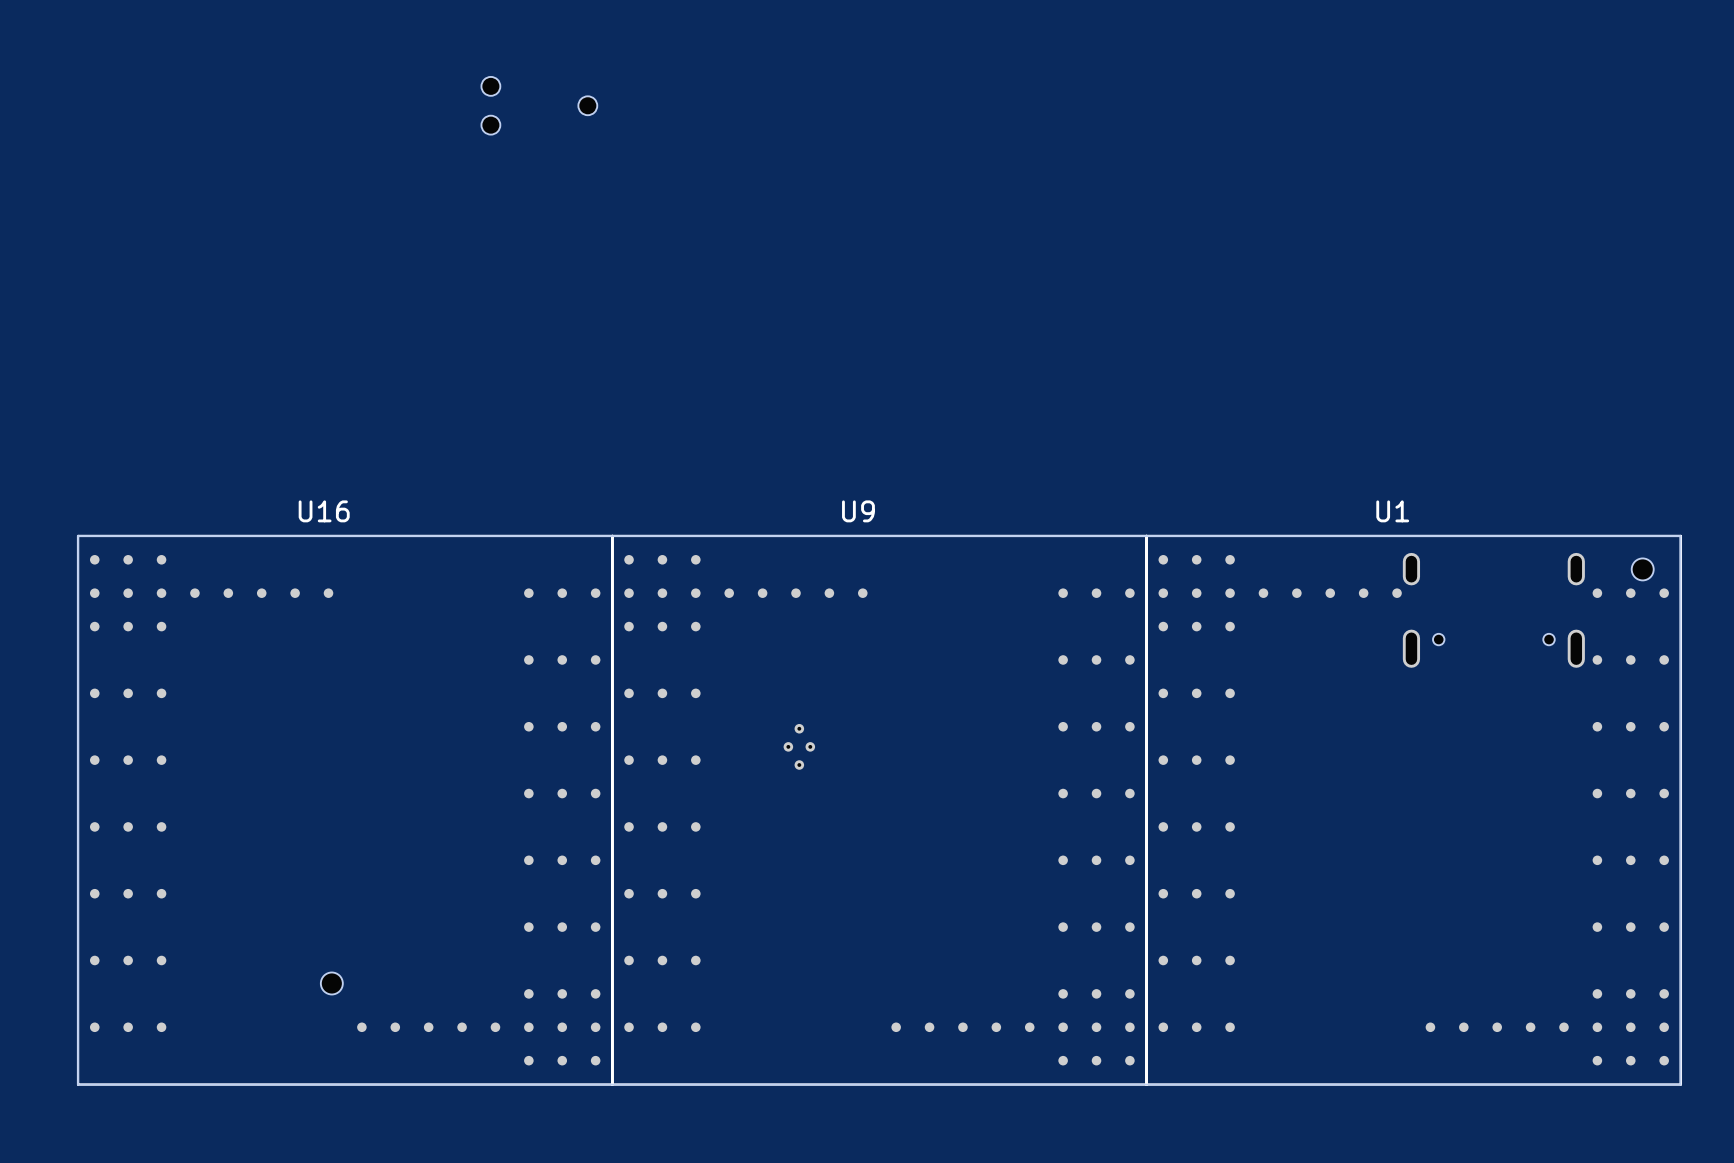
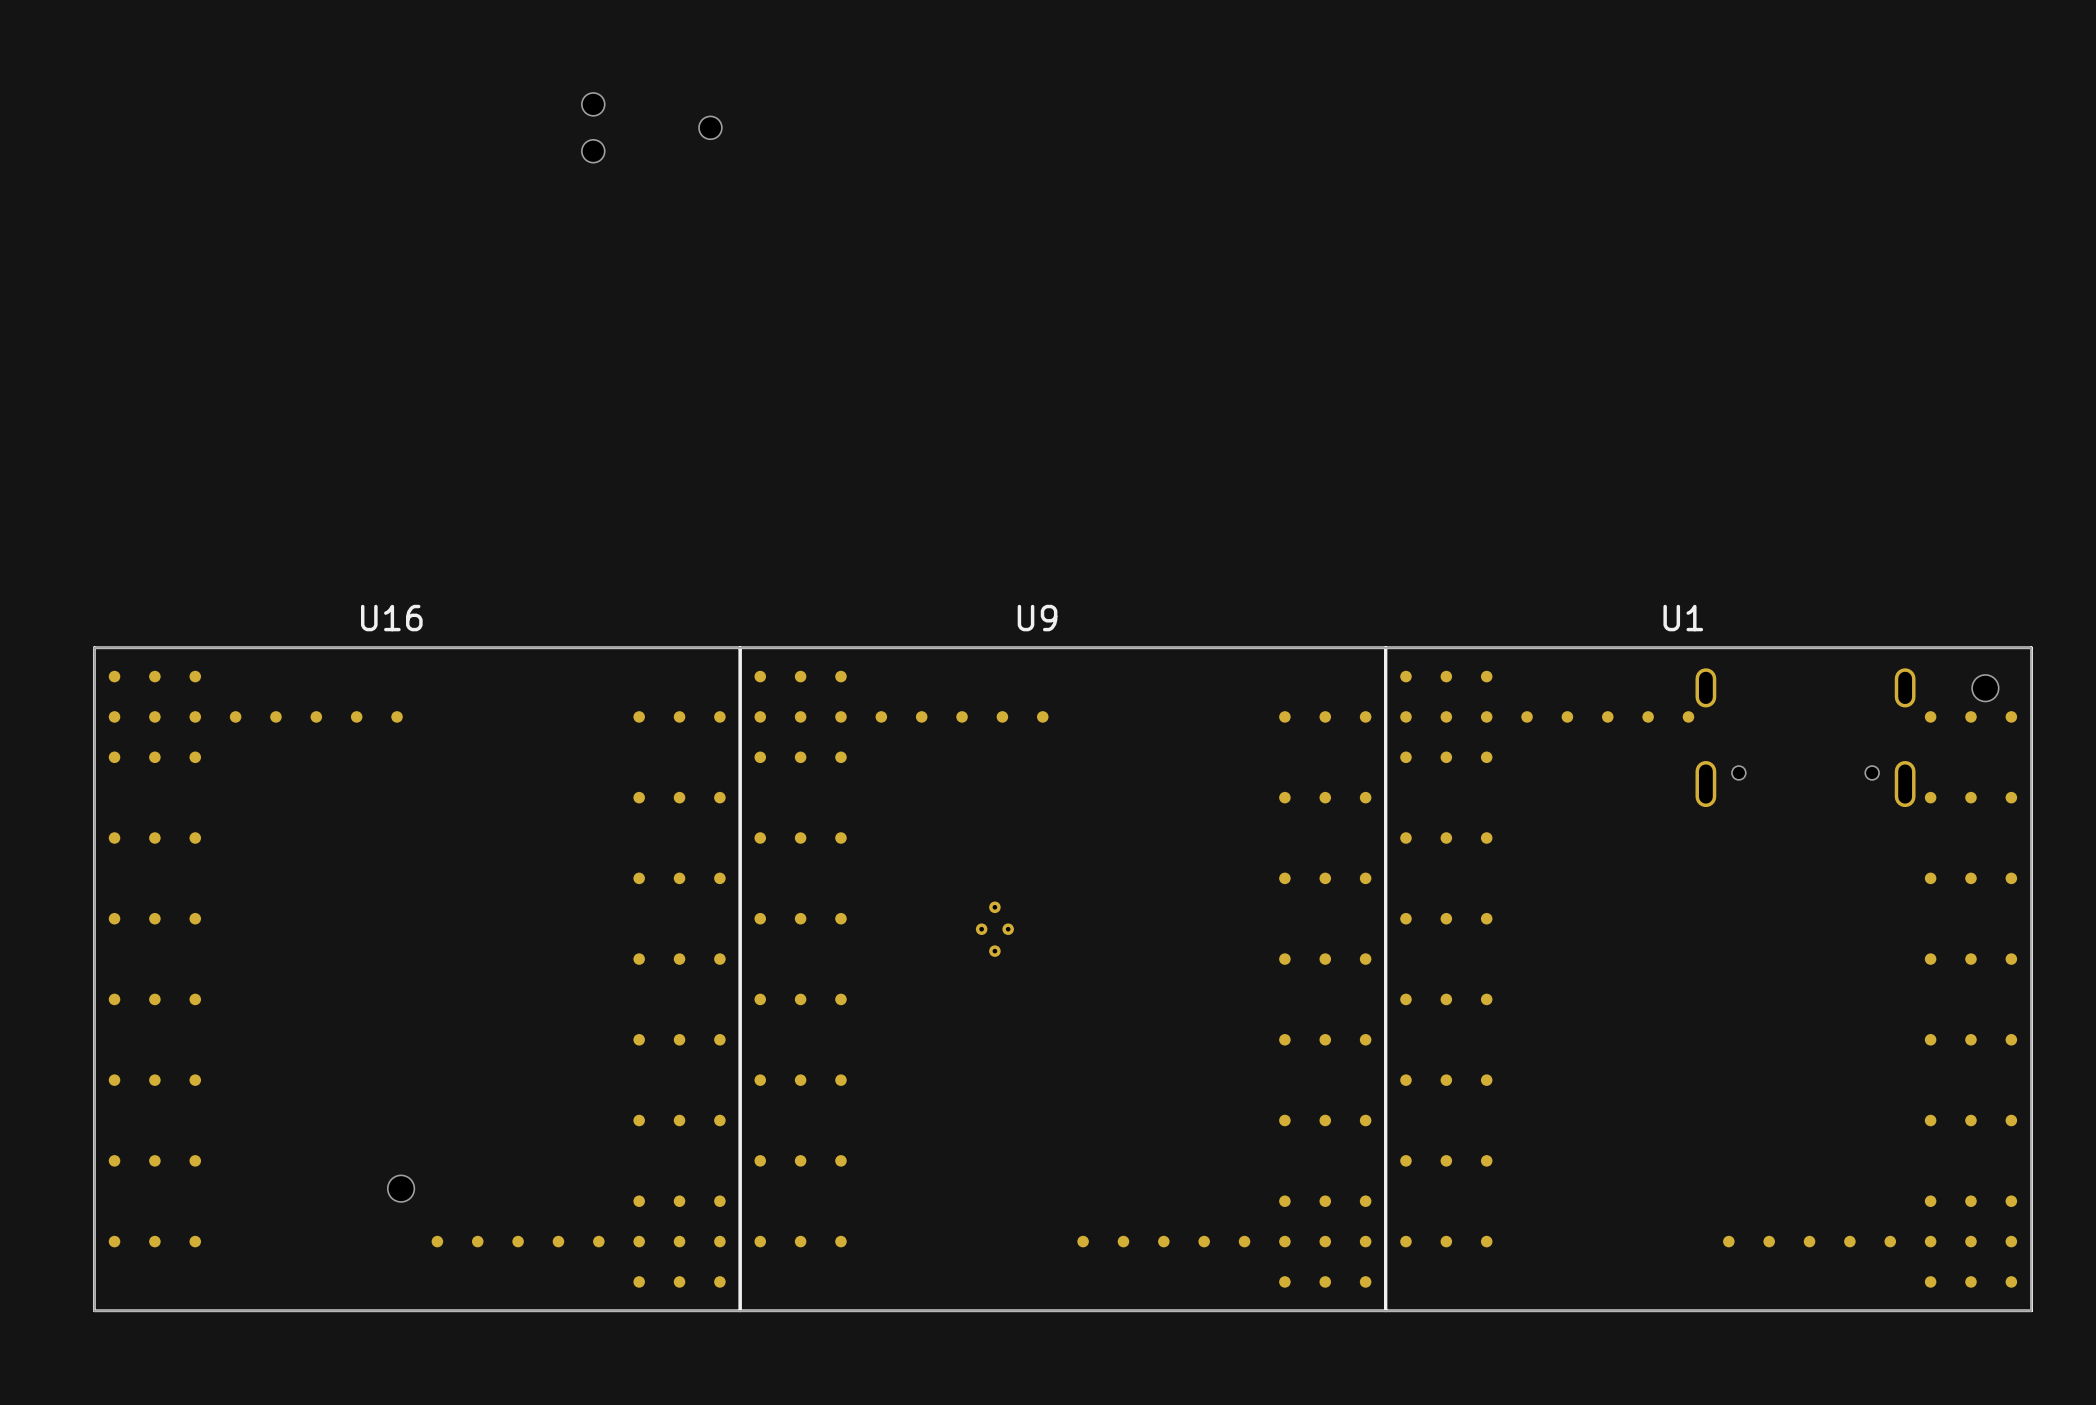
part position: (799, 746) -> (994, 929)

